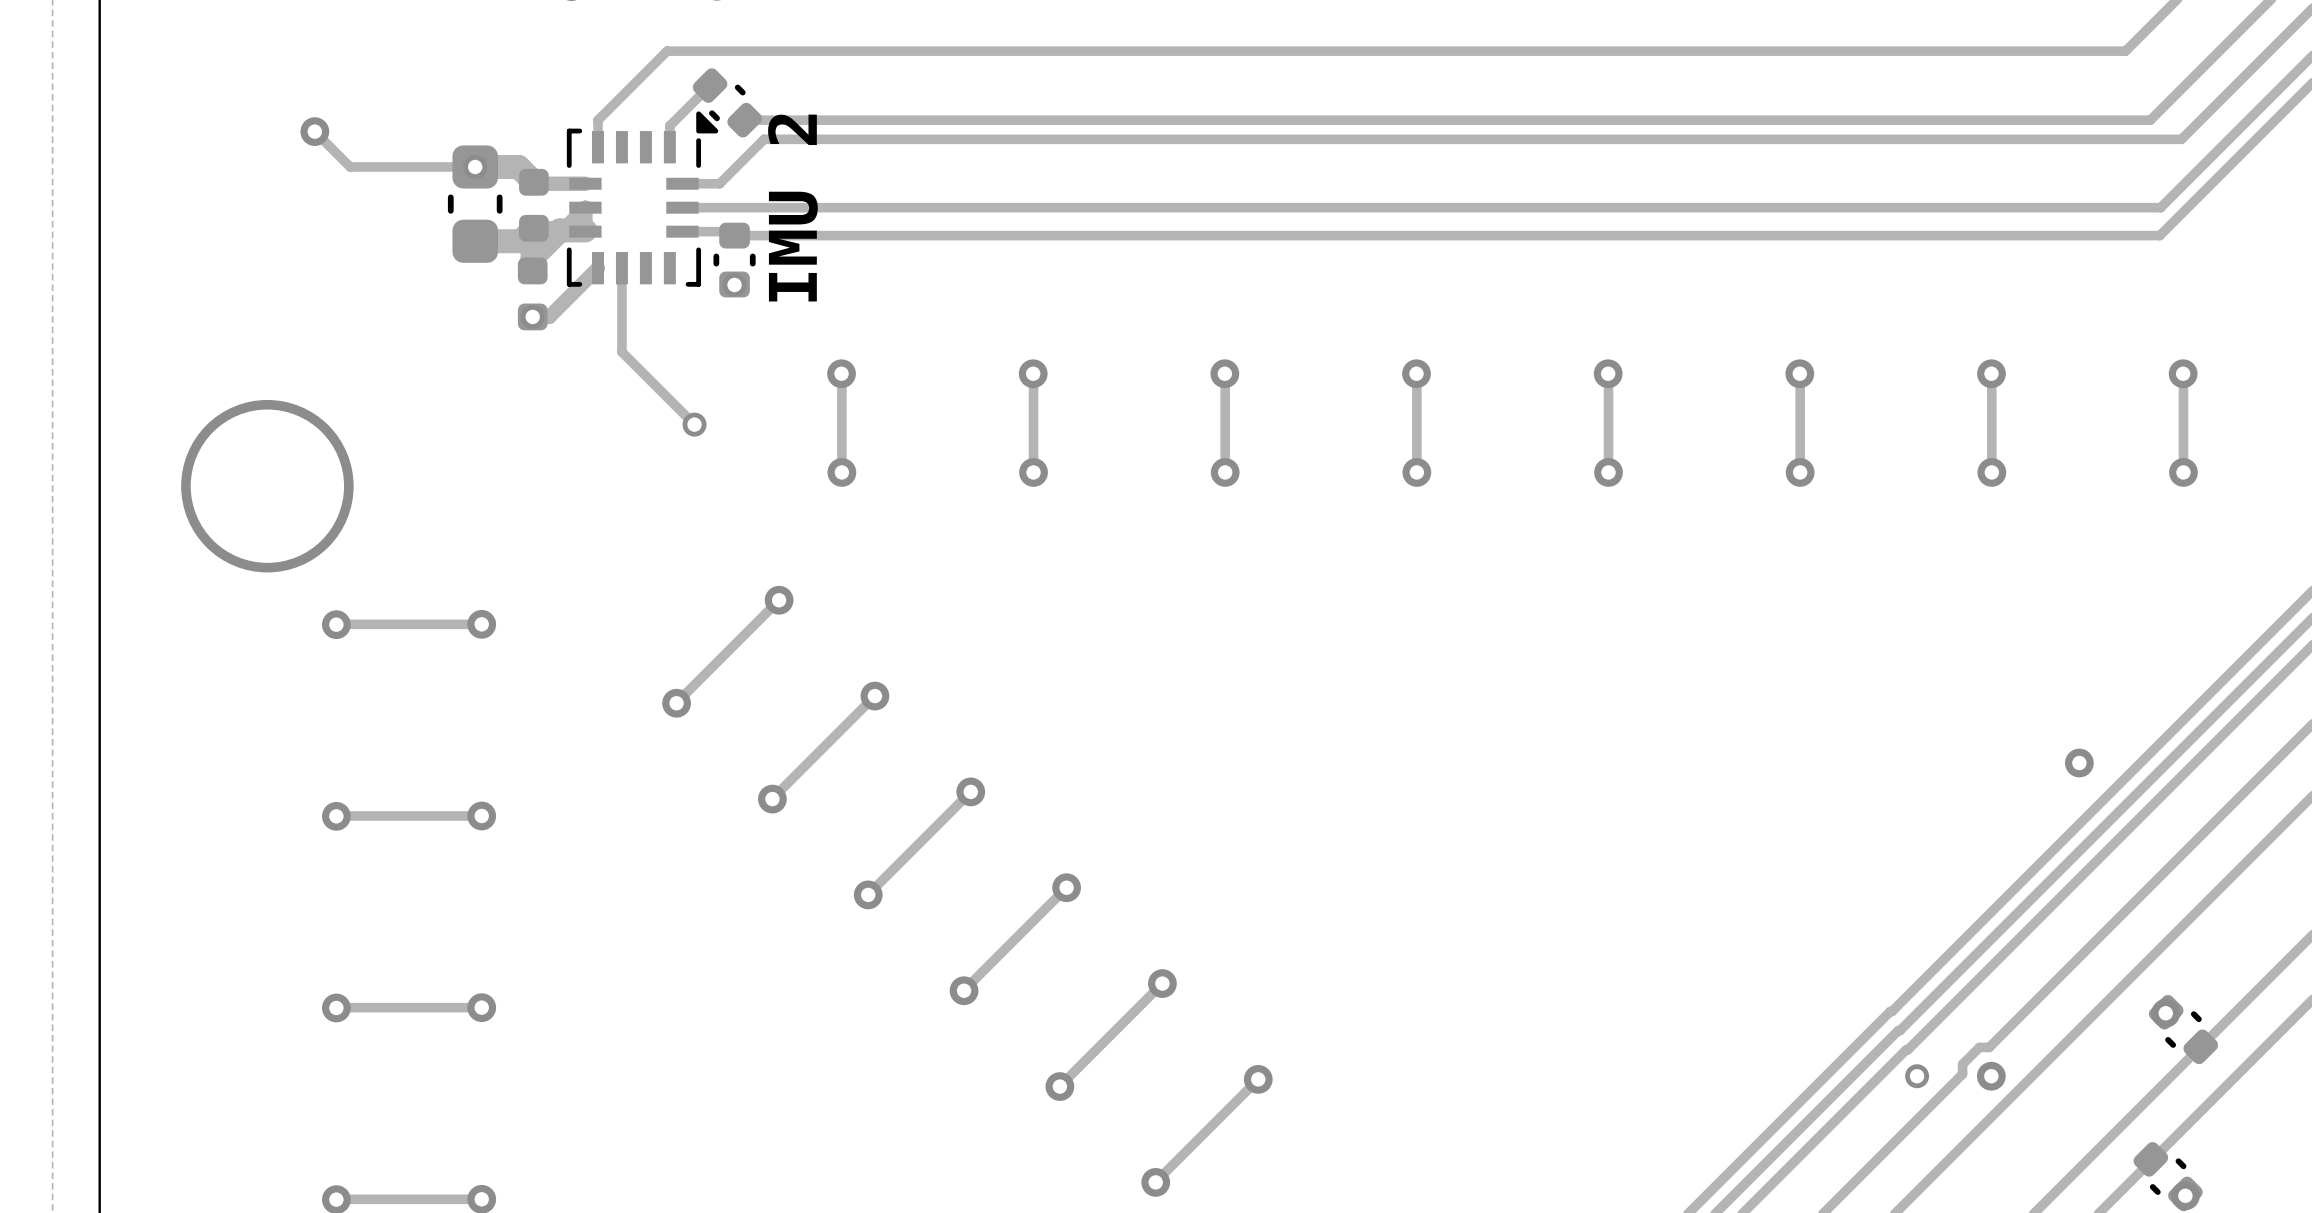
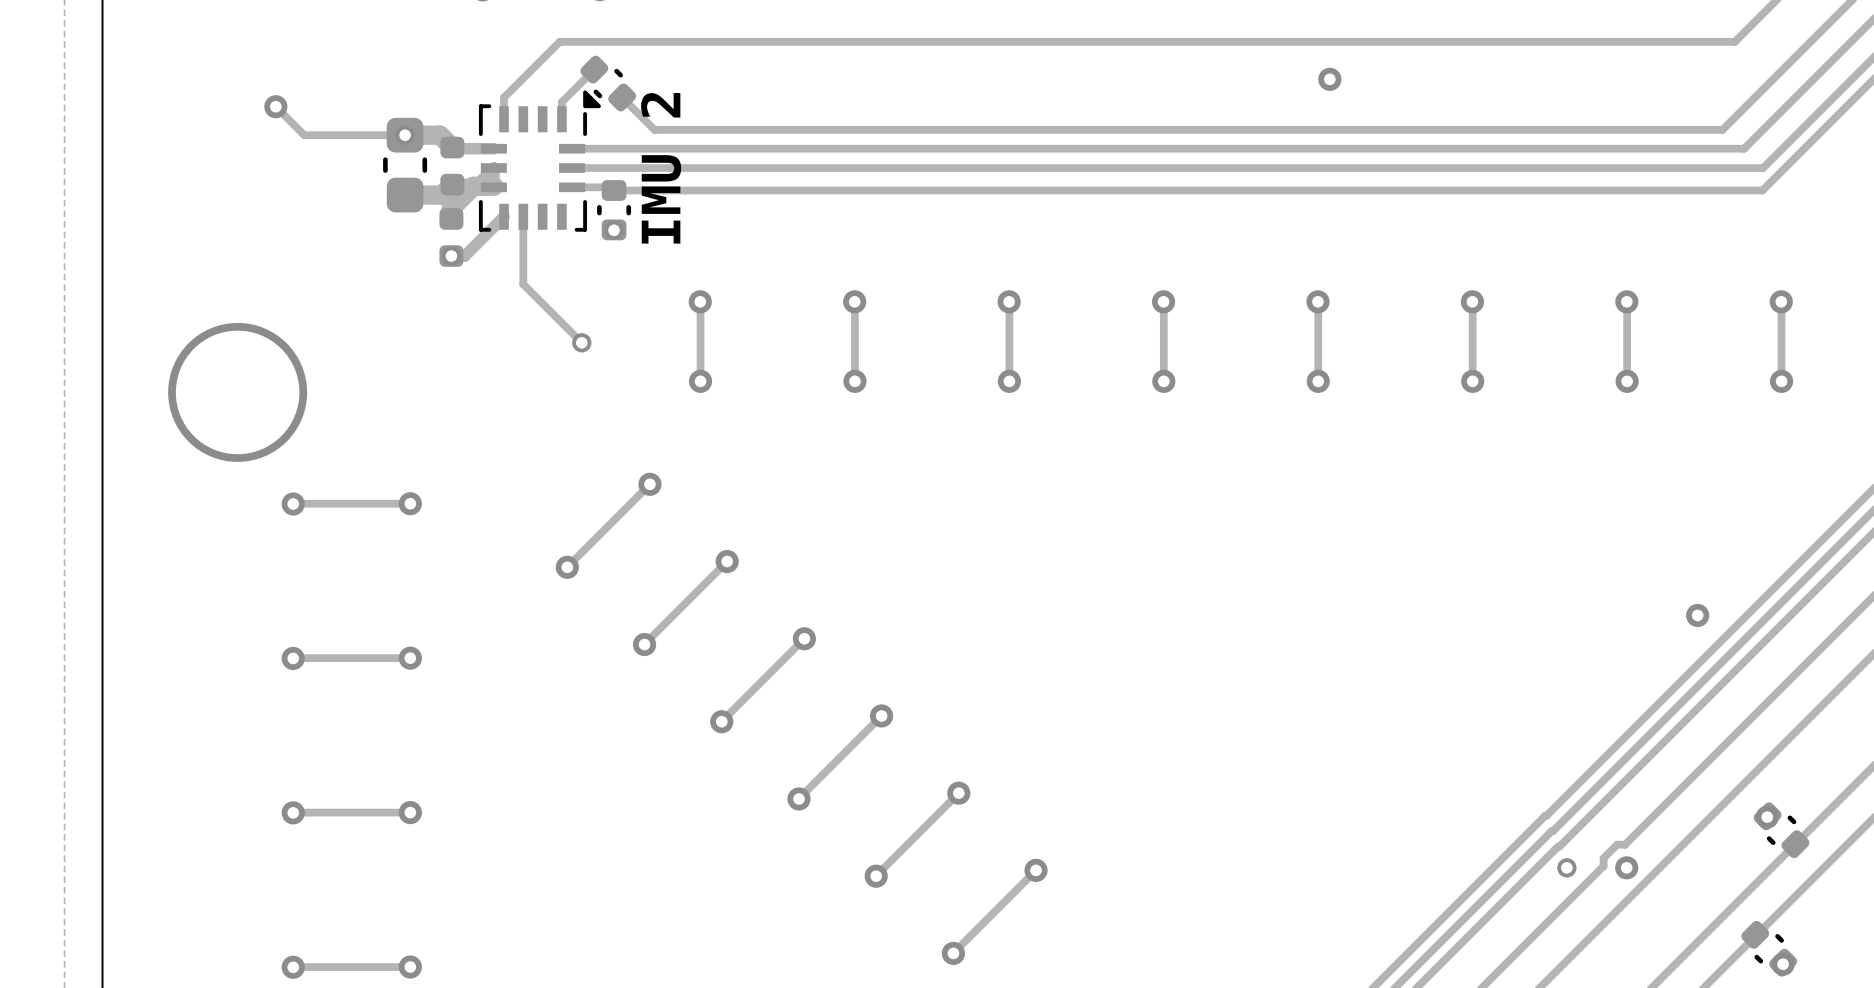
via: none -> (1329, 79)
track: (2150, 120) (744, 120) -> (1754, 97) (1722, 129) (654, 129) (622, 97)
track: (2181, 139) (764, 139) (719, 183) -> (1779, 112) (1744, 148) (602, 148)

